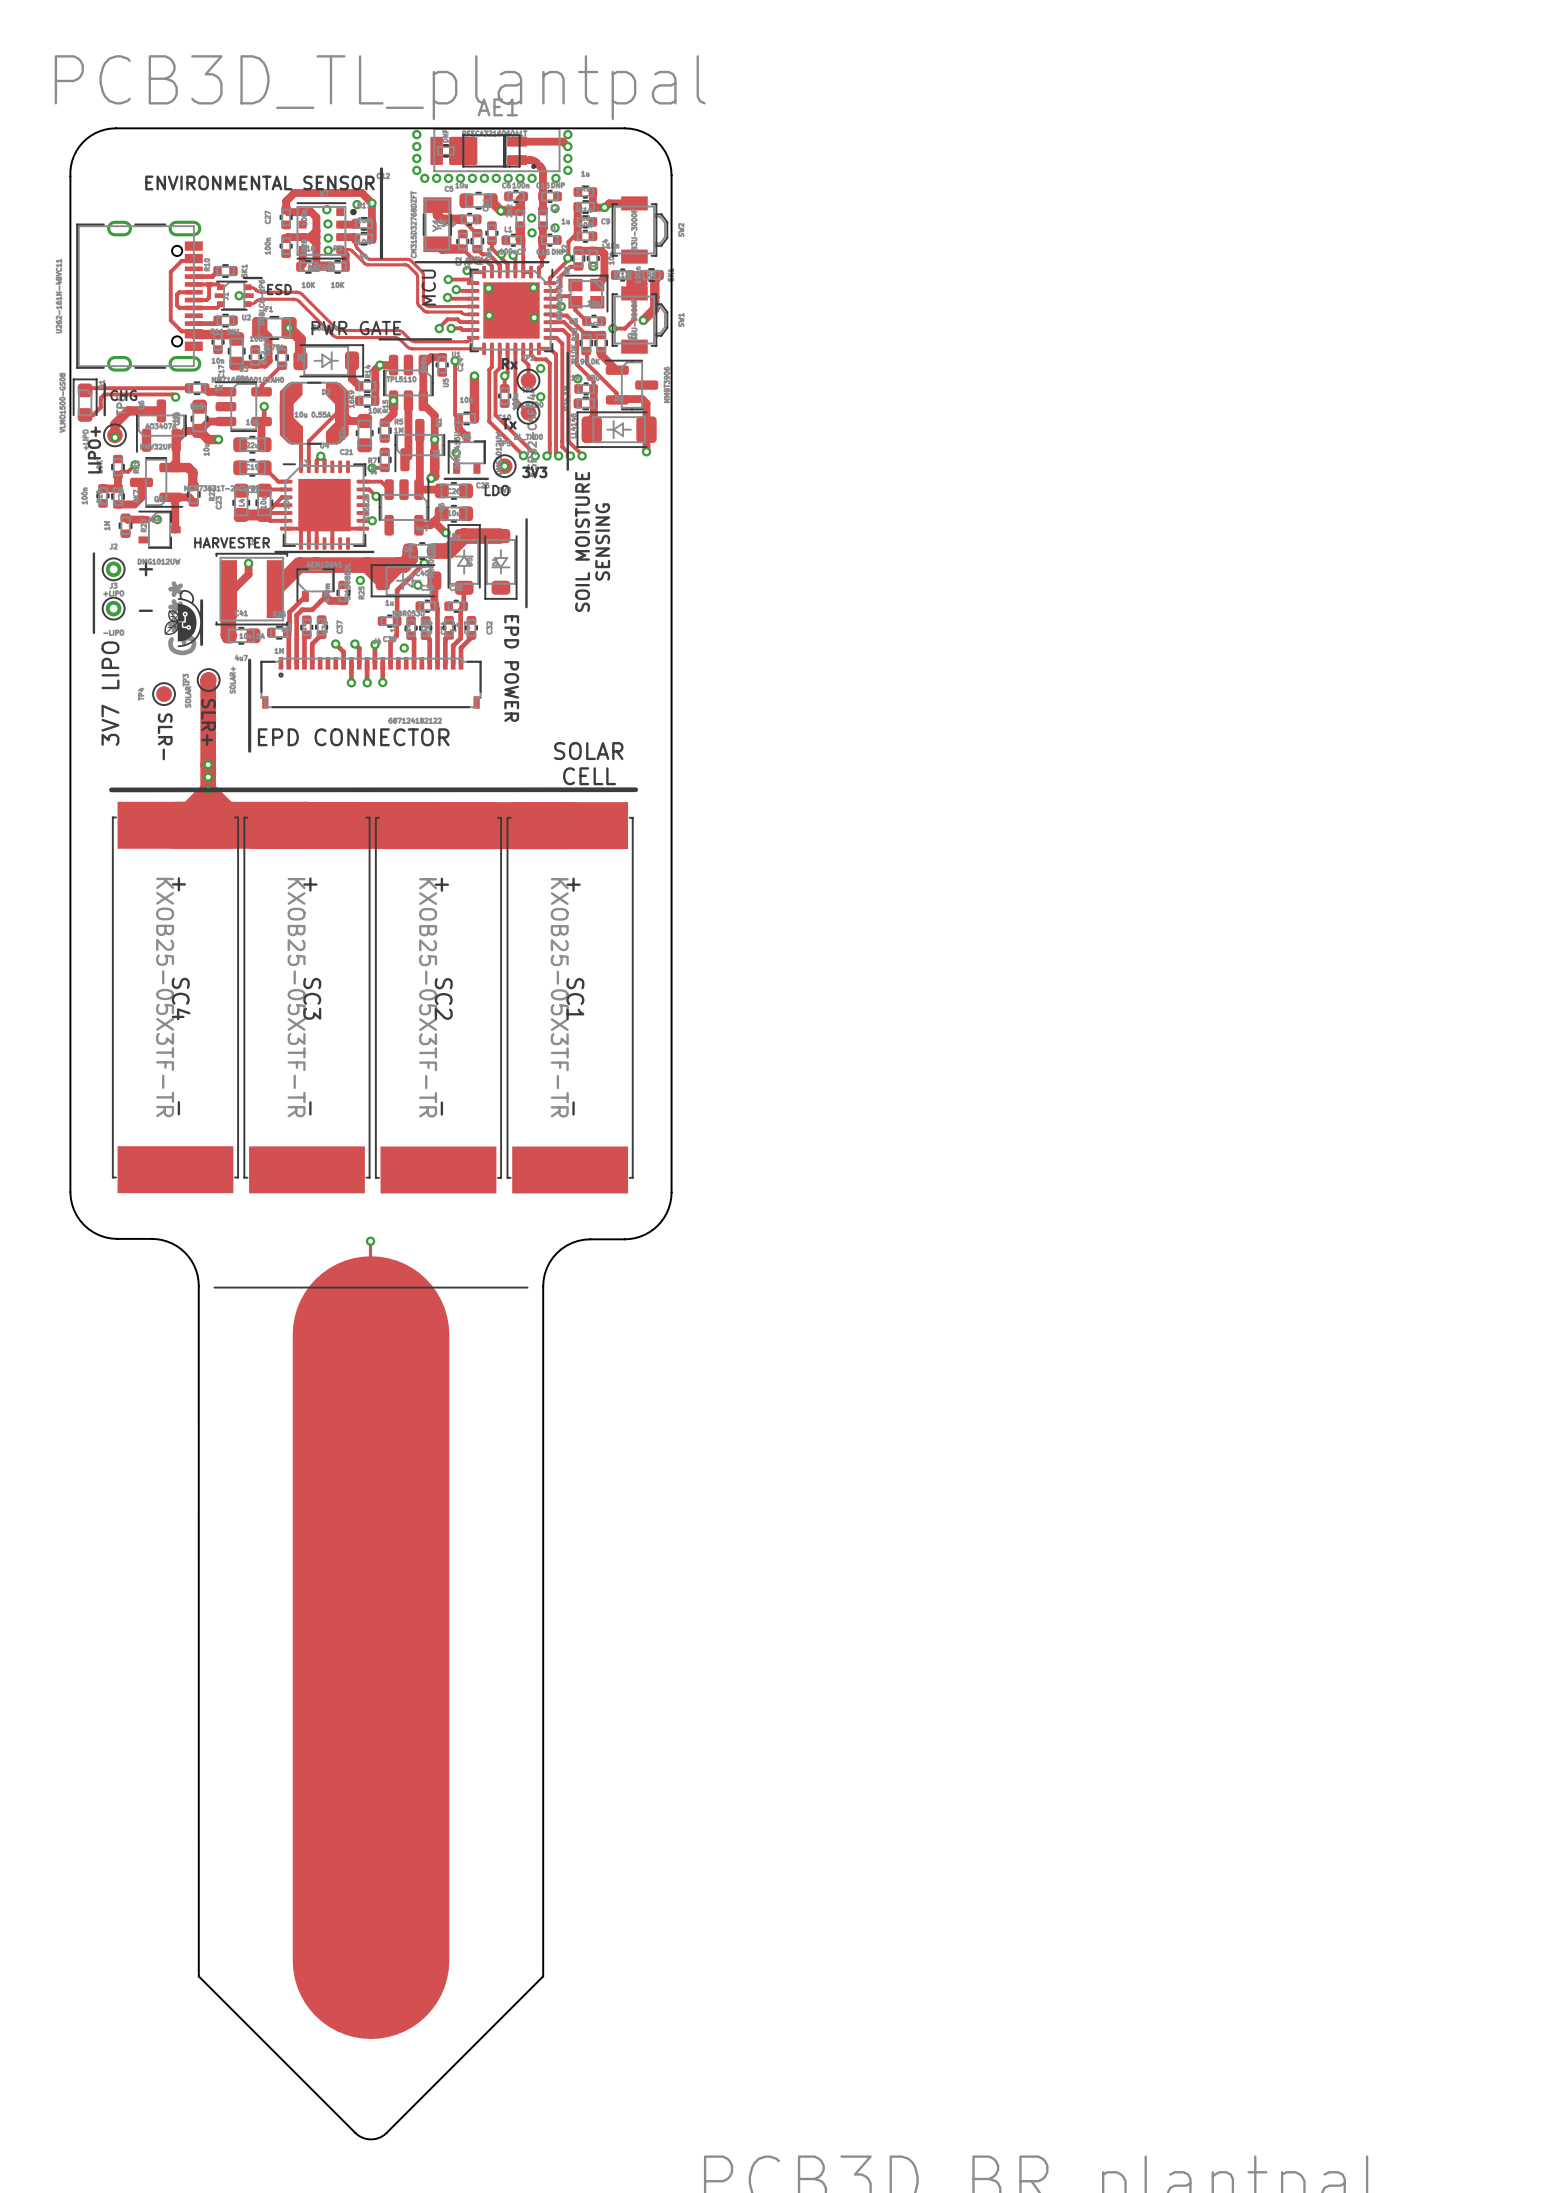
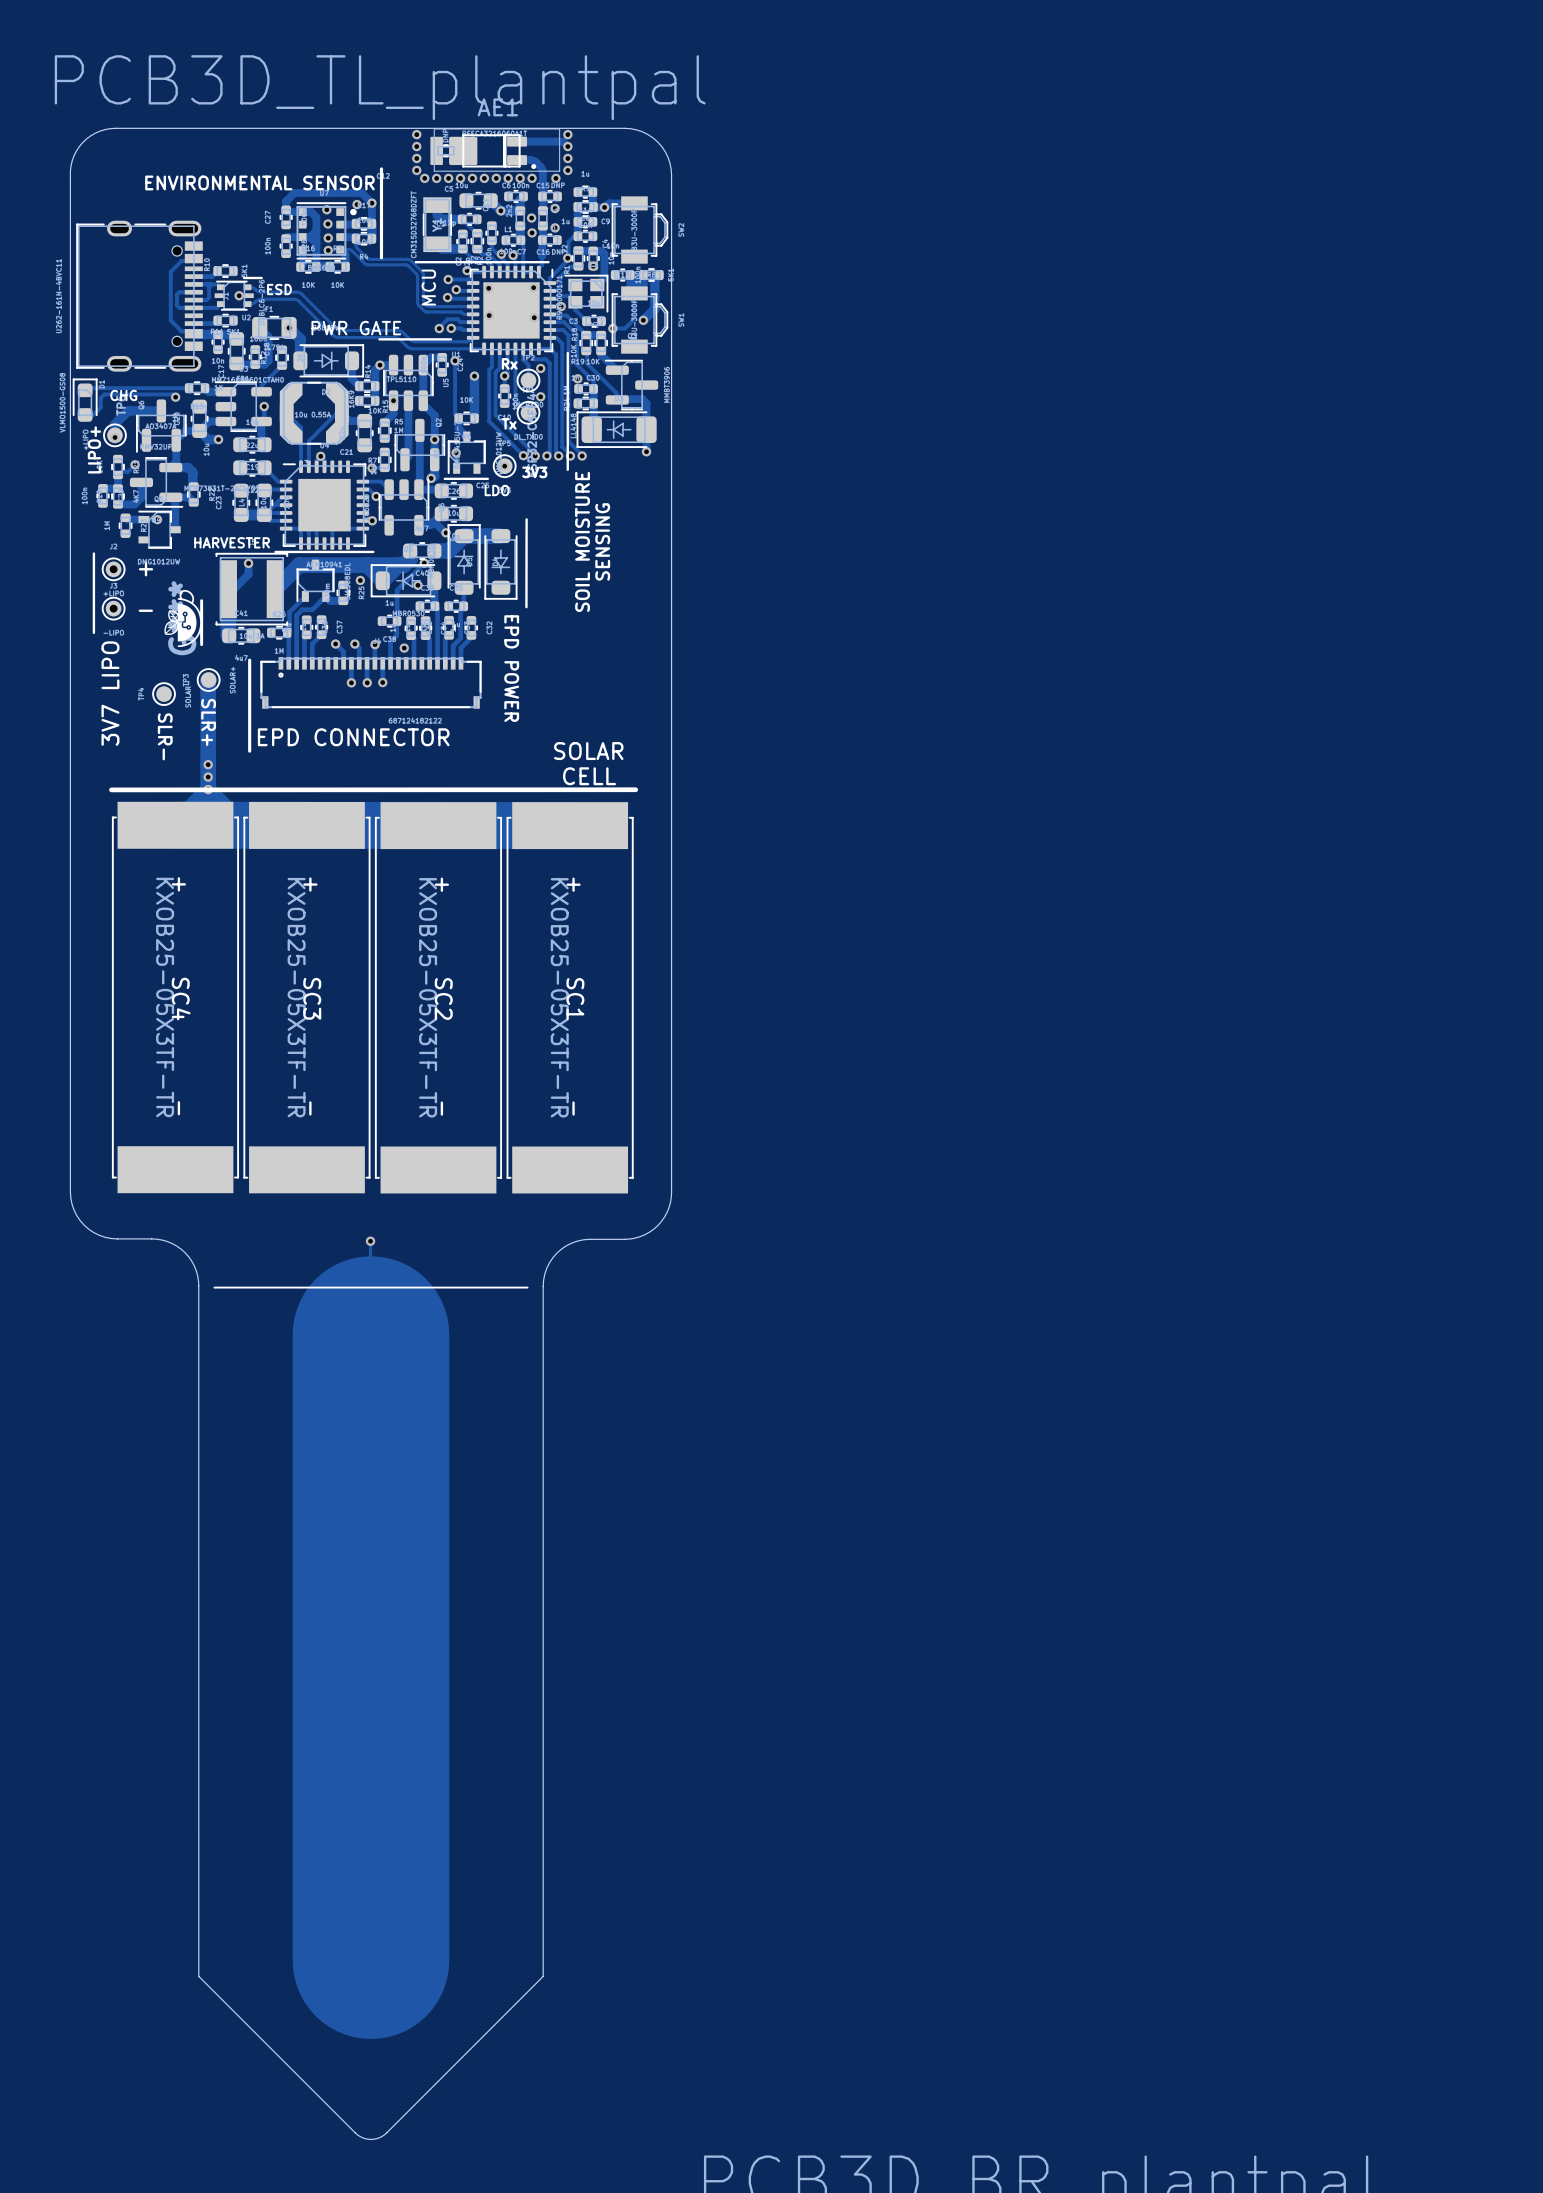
line: (104, 383) (104, 415) -> none

